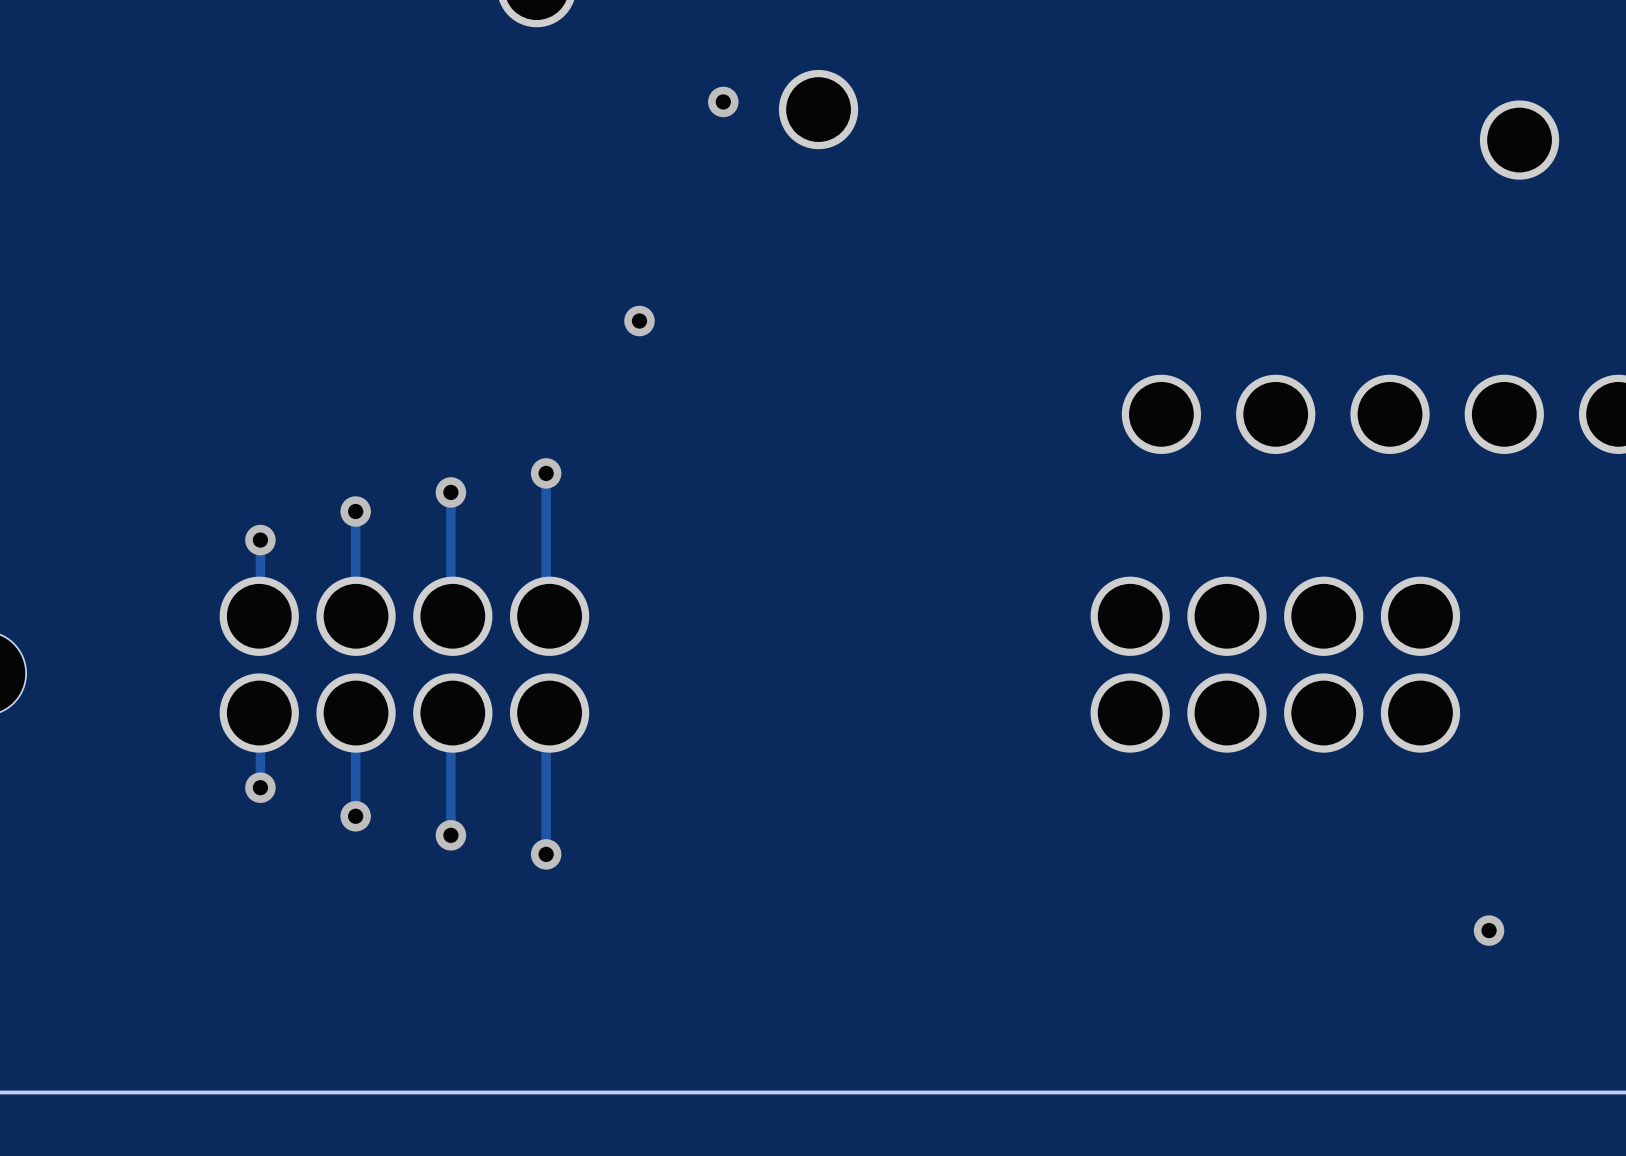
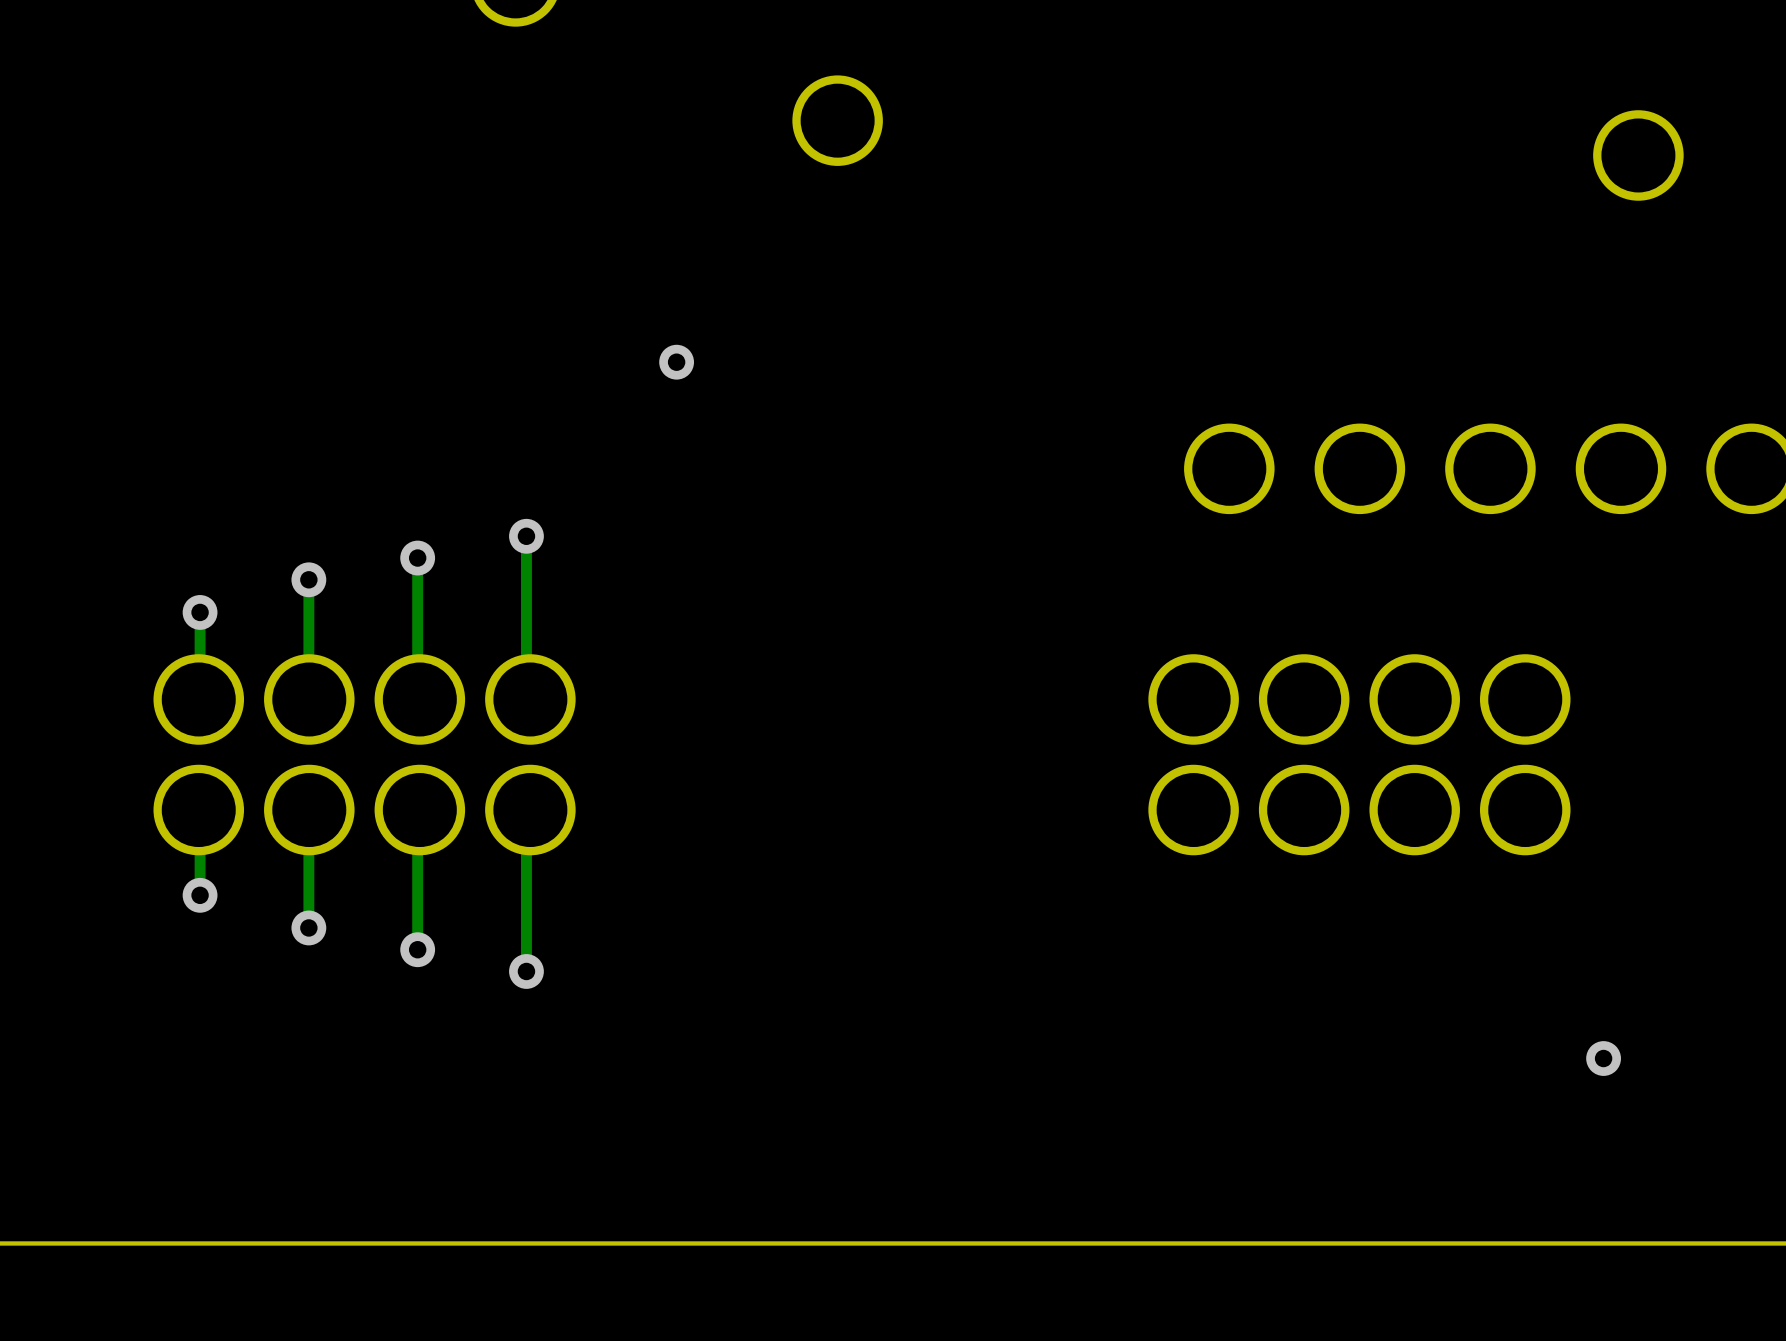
via: (723, 101) -> none
via position: (639, 321) -> (676, 362)

